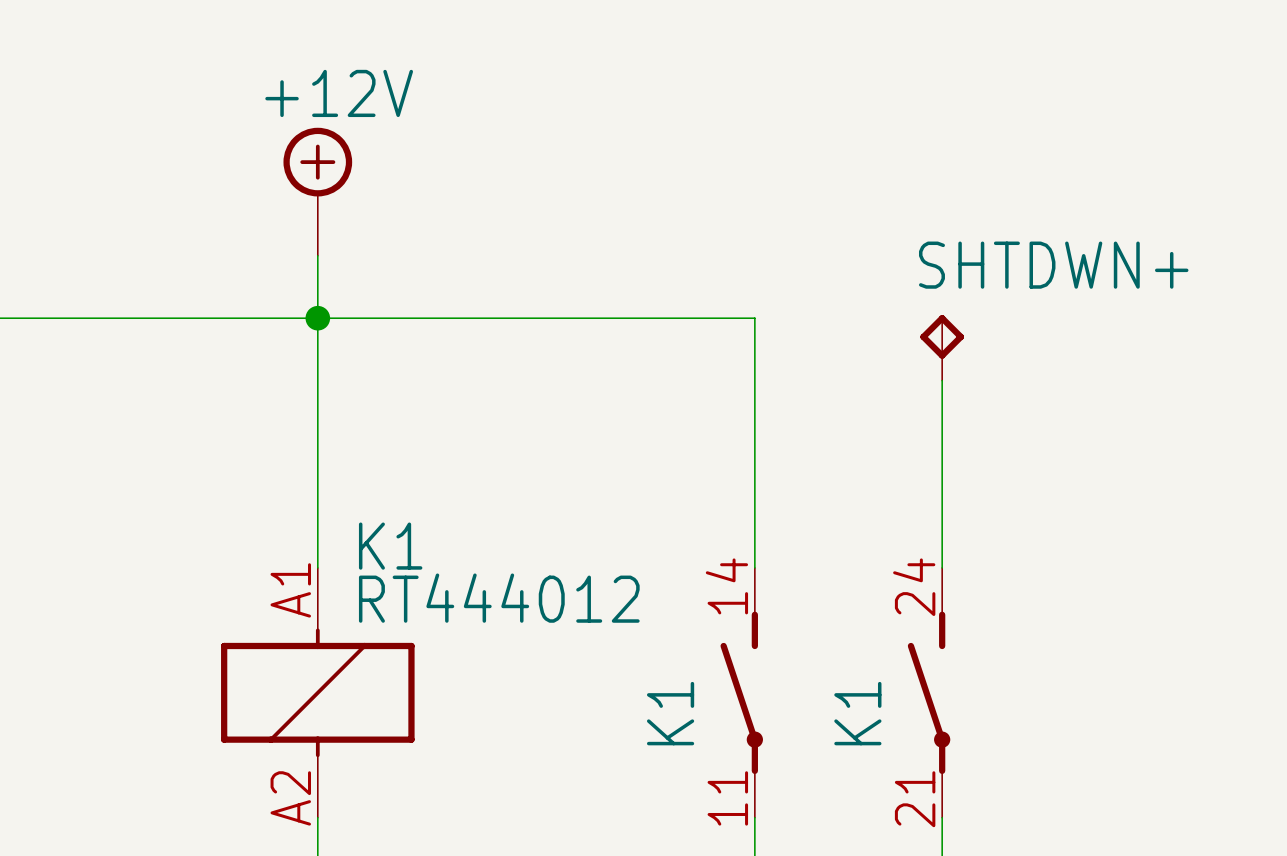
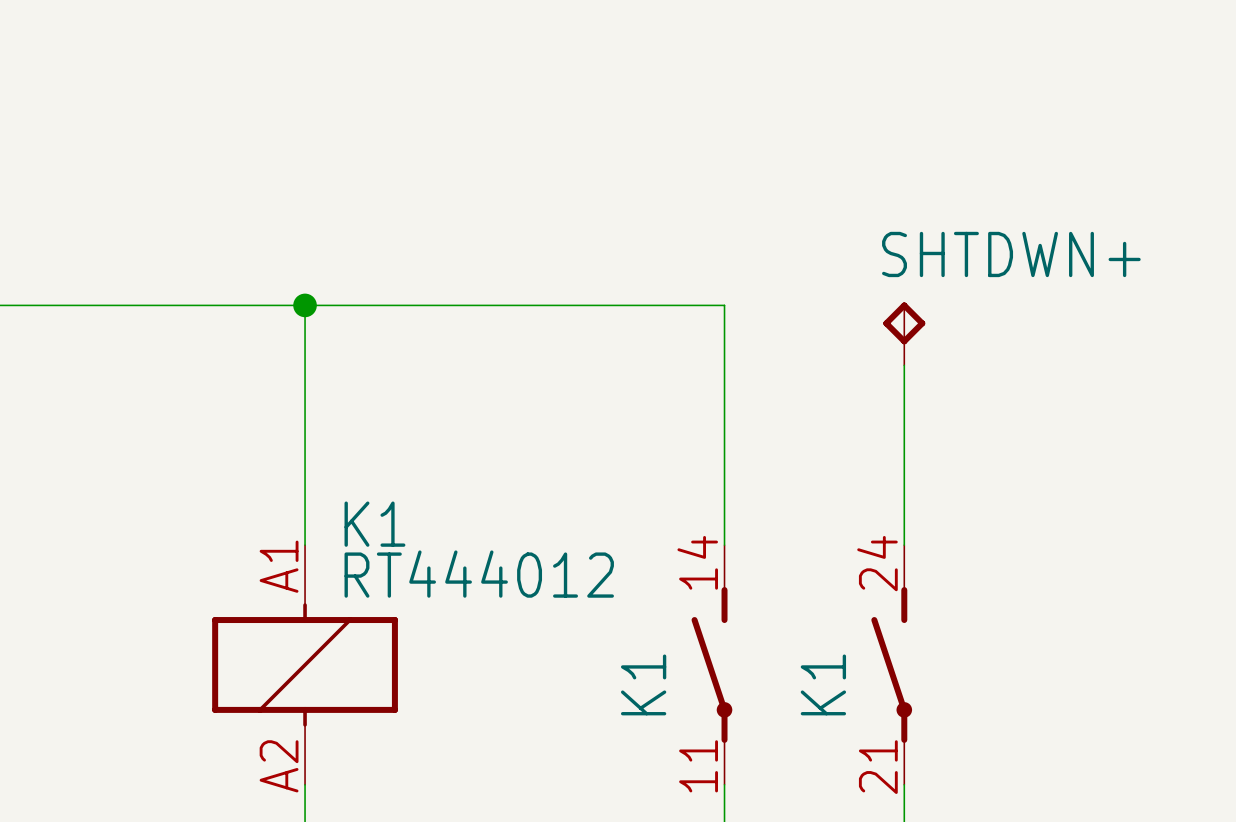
power symbol: +12V (317, 191) -> none
wire: (317, 255) (317, 318) -> none

